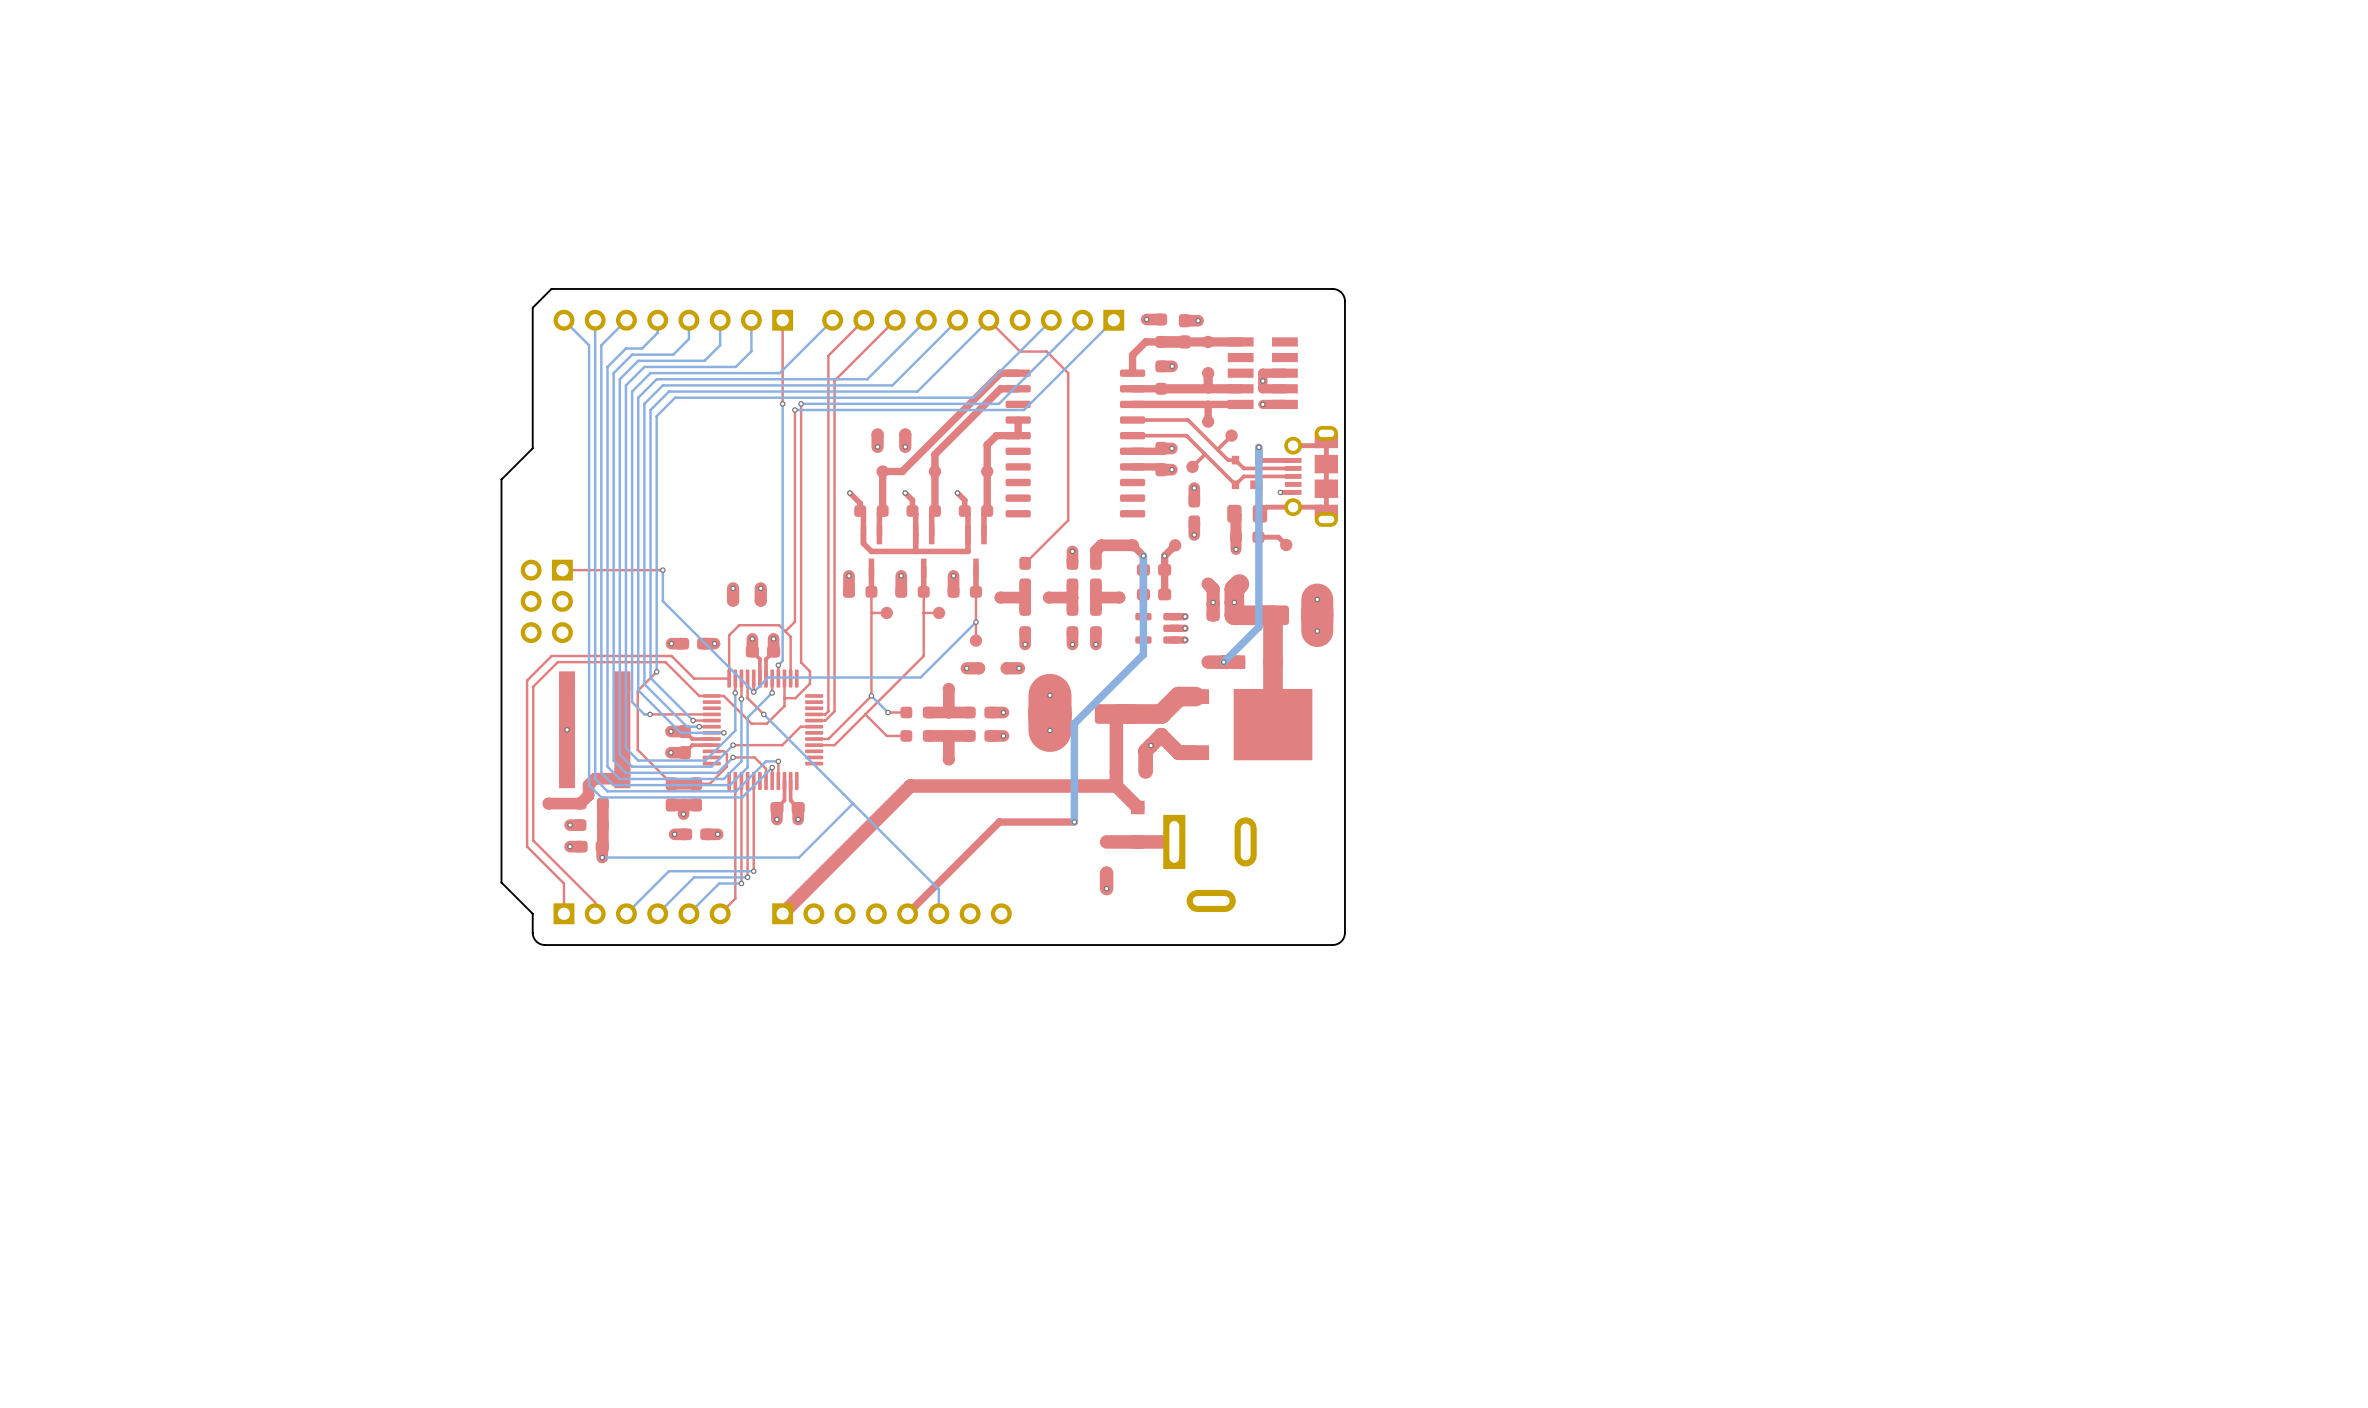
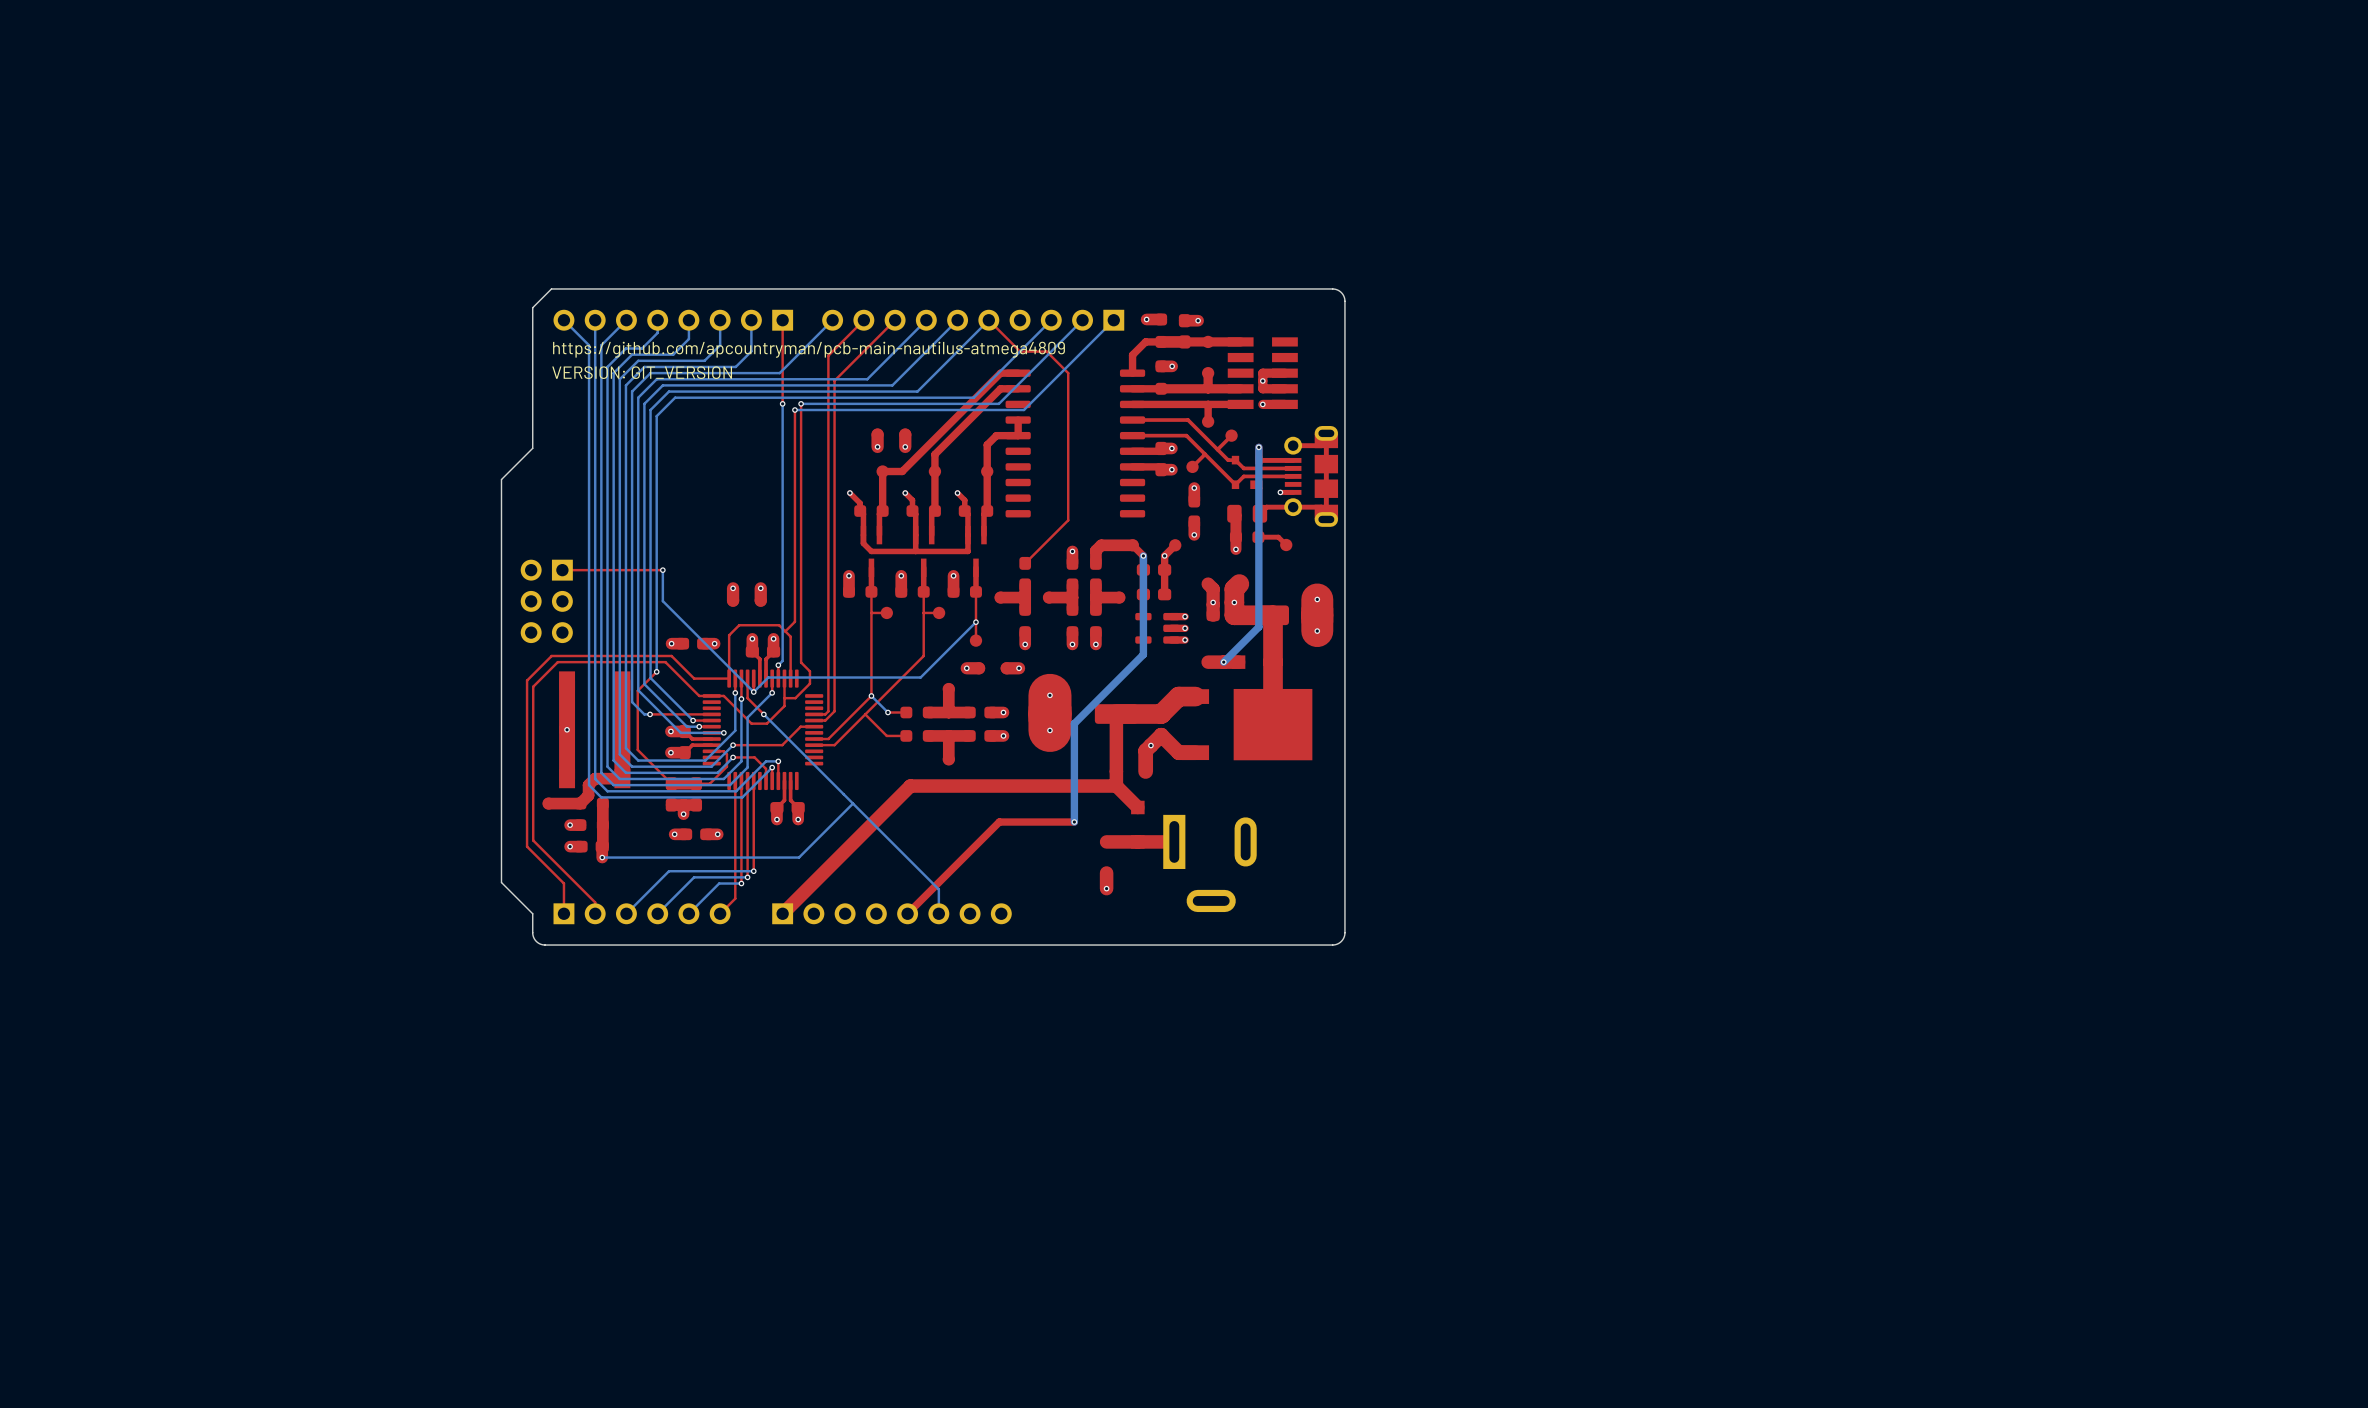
text: none -> https://github.com/apcountryman/pcb-main-nautilus-atmega4809 (808, 349)
text: none -> VERSION: GIT_VERSION (642, 372)

